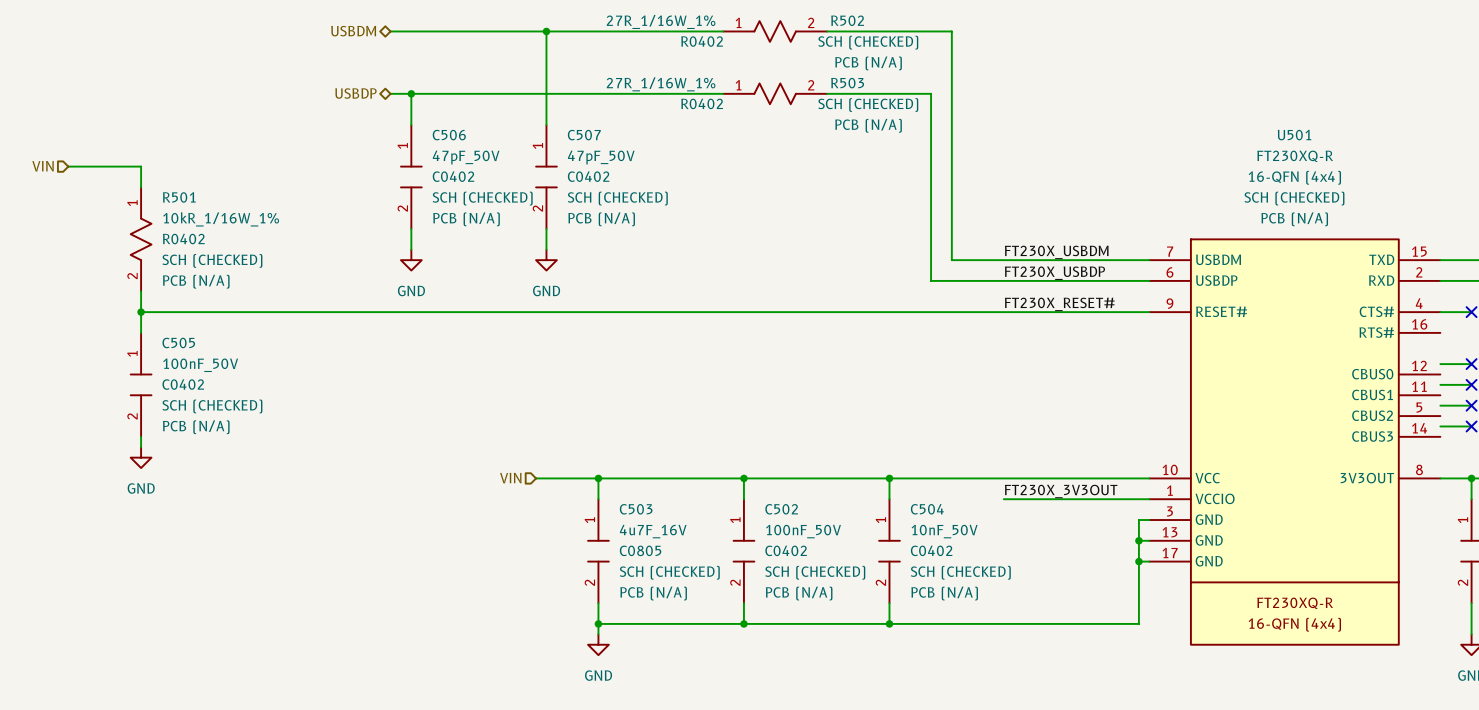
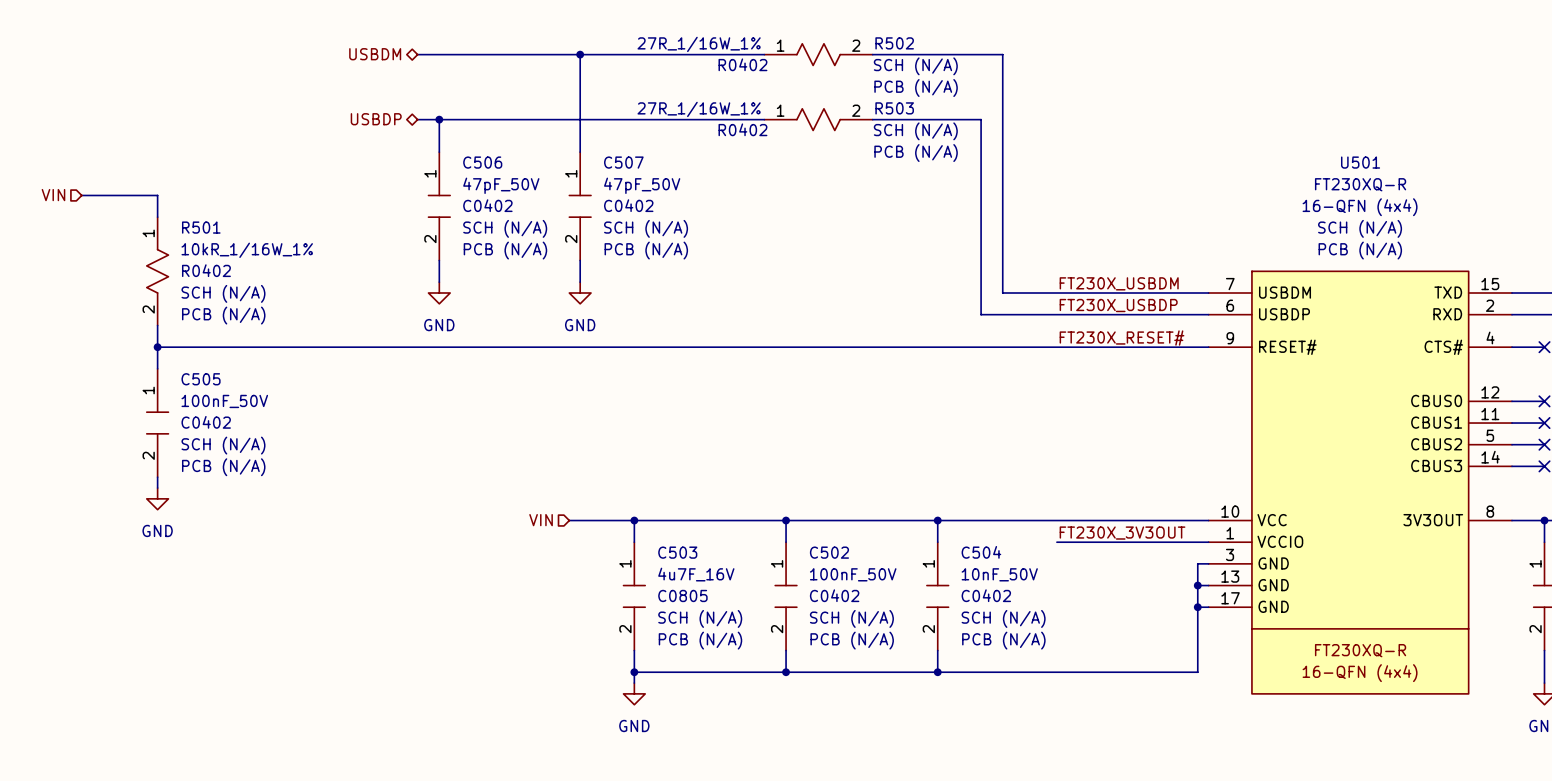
R502 text: SCH (CHECKED) (868, 42) -> SCH (N/A) (915, 66)
R503 text: SCH (CHECKED) (868, 105) -> SCH (N/A) (915, 131)
C506 text: SCH (CHECKED) (482, 198) -> SCH (N/A) (505, 228)
C507 text: SCH (CHECKED) (617, 198) -> SCH (N/A) (646, 228)
U501 text: SCH (CHECKED) (1294, 198) -> SCH (N/A) (1360, 228)
U501 symbol: [1149, 239, 1441, 645] -> [1208, 271, 1512, 694]
R501 text: SCH (CHECKED) (212, 260) -> SCH (N/A) (223, 293)
C505 text: SCH (CHECKED) (212, 406) -> SCH (N/A) (223, 445)
C503 text: SCH (CHECKED) (669, 572) -> SCH (N/A) (700, 618)
C502 text: SCH (CHECKED) (815, 572) -> SCH (N/A) (851, 618)
C504 text: SCH (CHECKED) (960, 572) -> SCH (N/A) (1003, 618)

